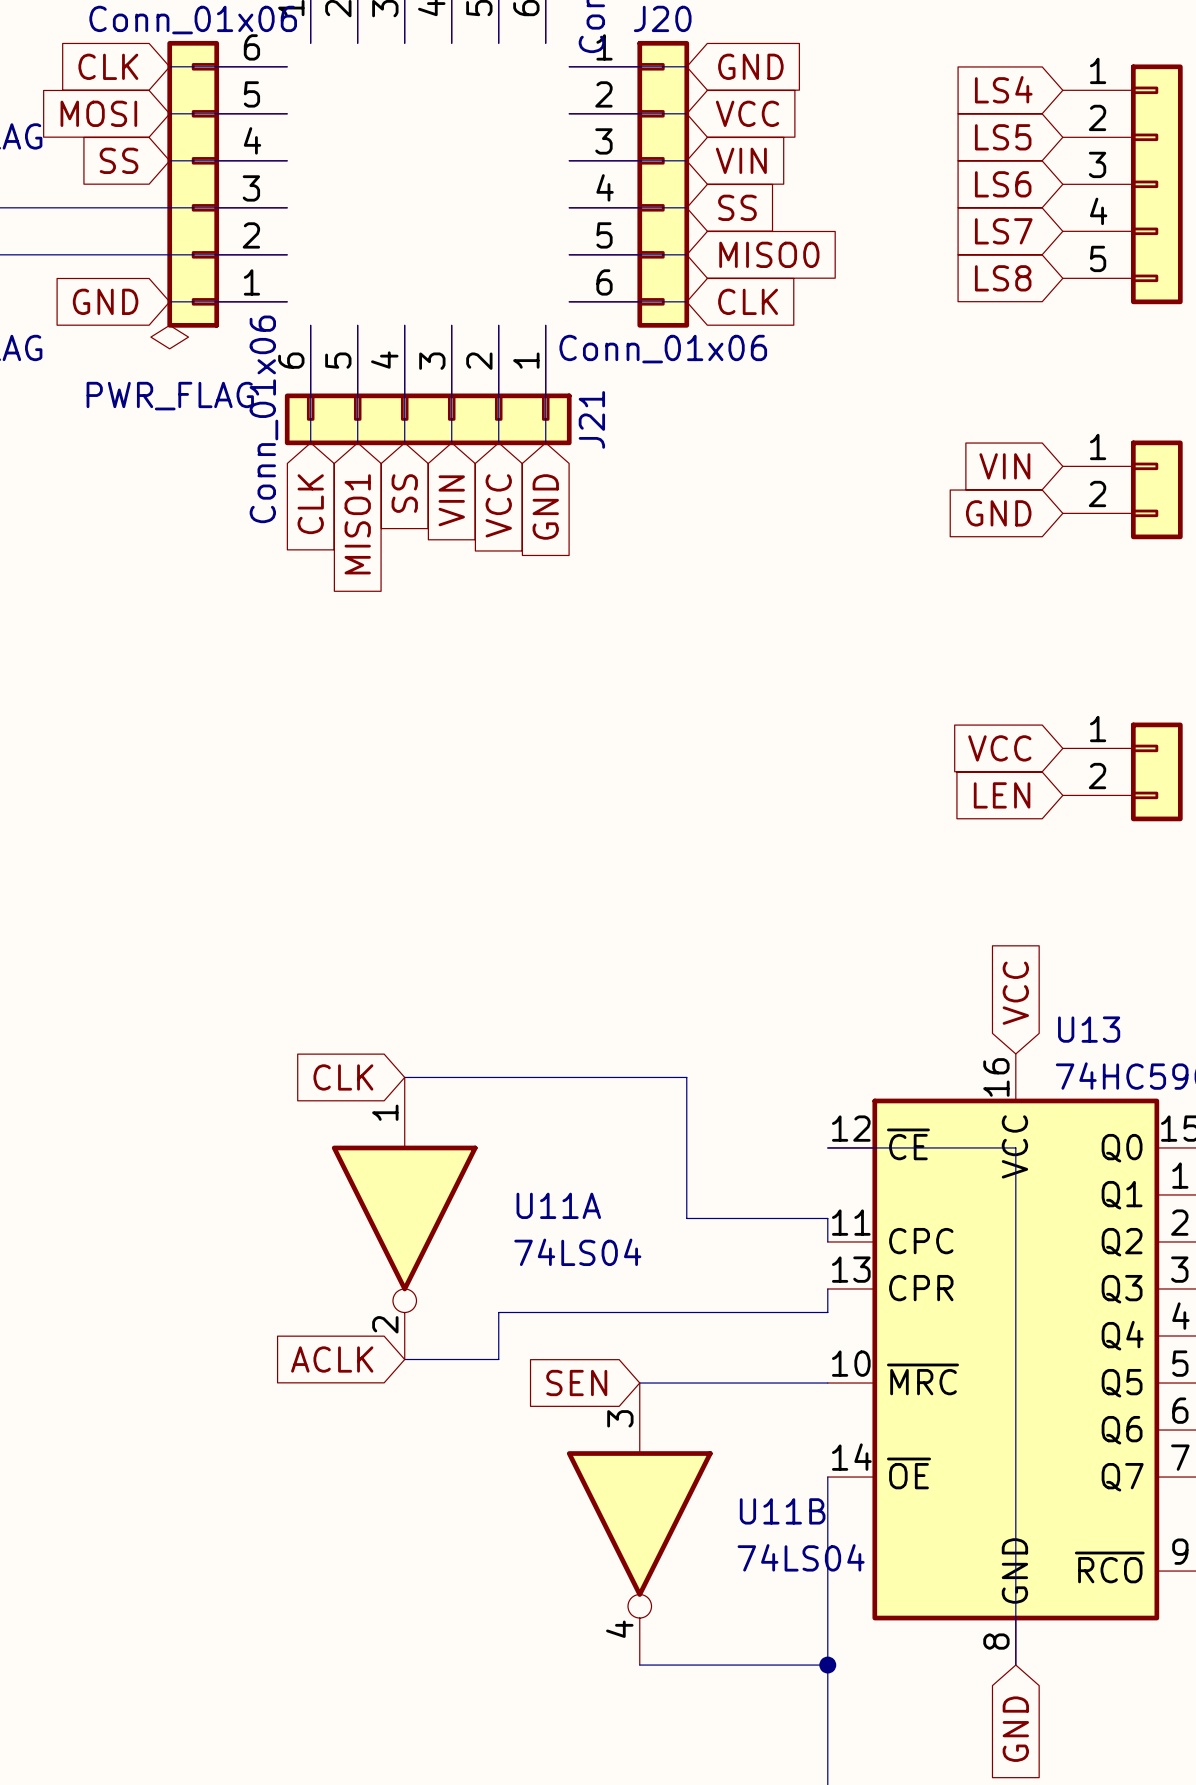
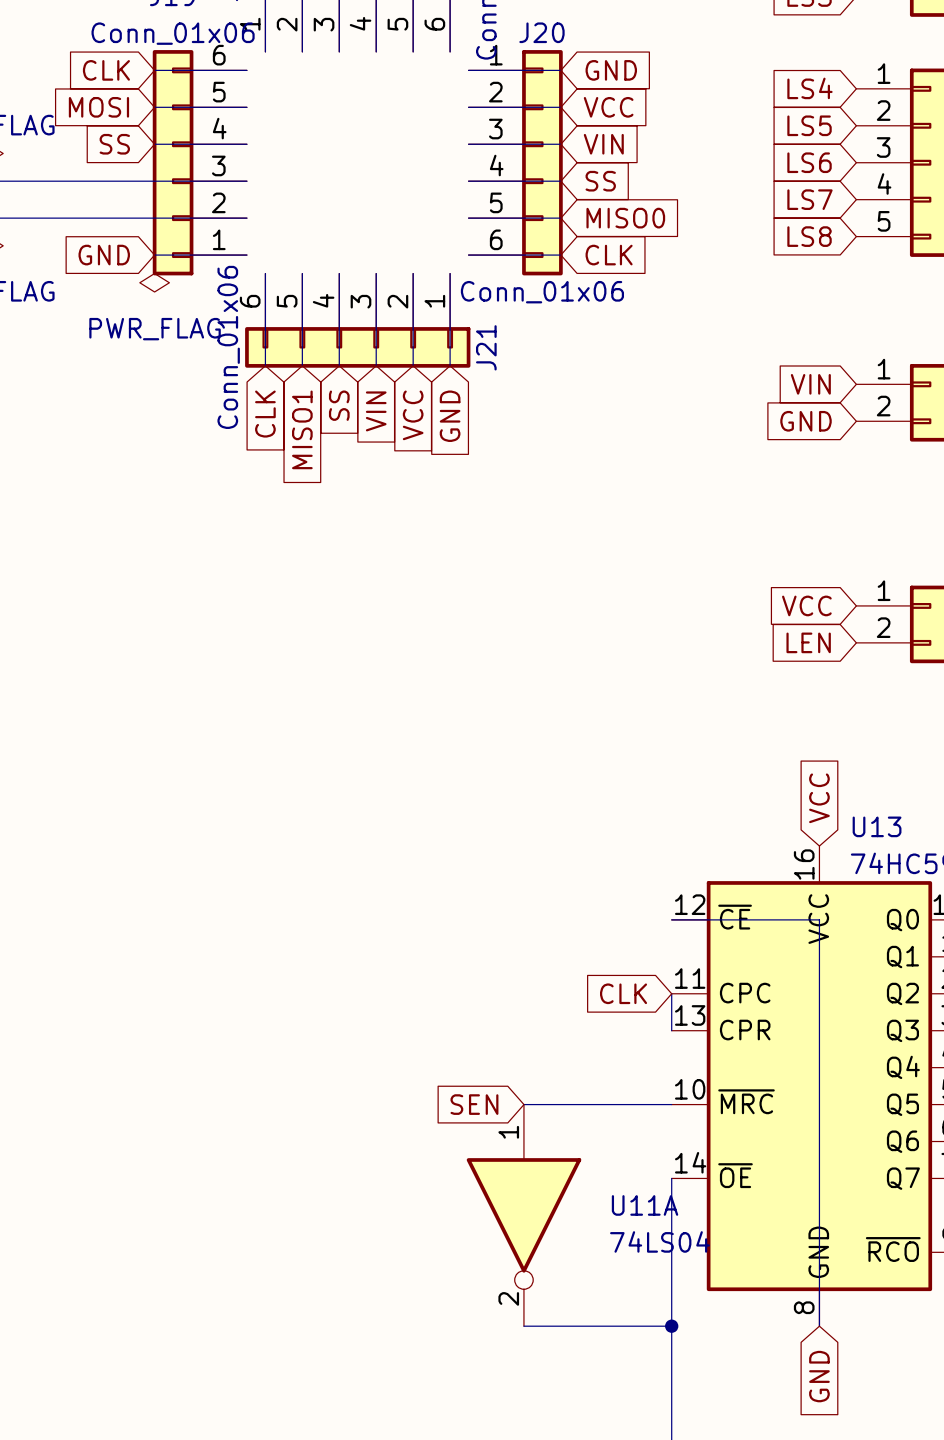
global label position: CLK (343, 1077) -> CLK (623, 993)
wire: (404, 1077) (686, 1077) (686, 1218) (827, 1218) (827, 1241) -> none
U11A position: (404, 1218) -> (523, 1215)
wire: (827, 1288) (827, 1312) (498, 1312) (498, 1359) (404, 1359) -> (671, 1030) (671, 993)
global label: ACLK (332, 1359) -> none
U11B: 74LS04 (639, 1524) -> none

